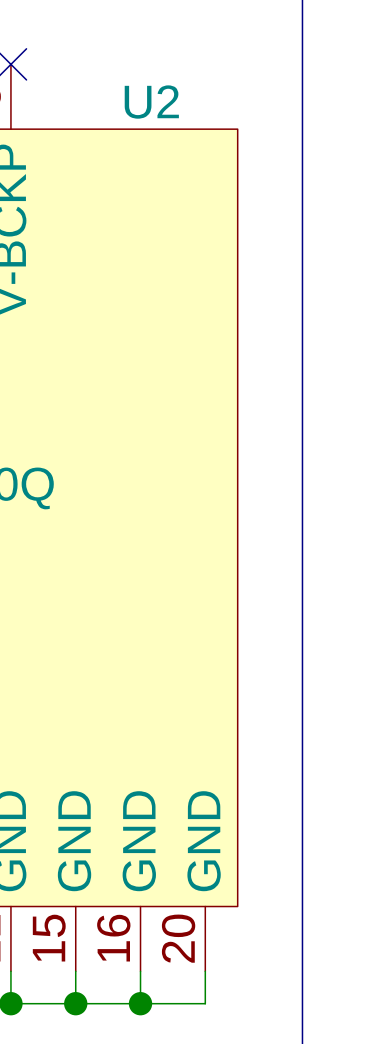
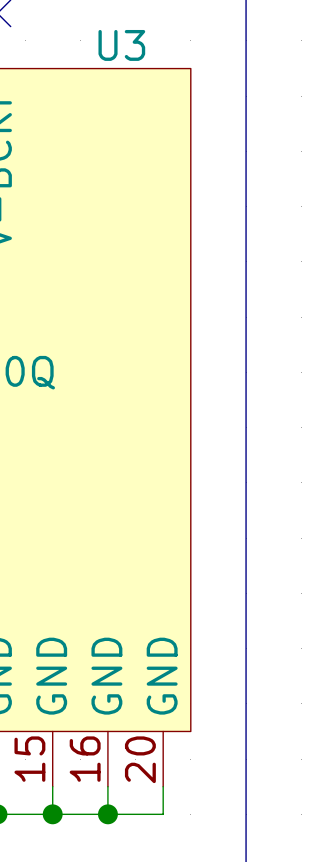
U2 name: U2 (151, 102) -> U3 (121, 45)

